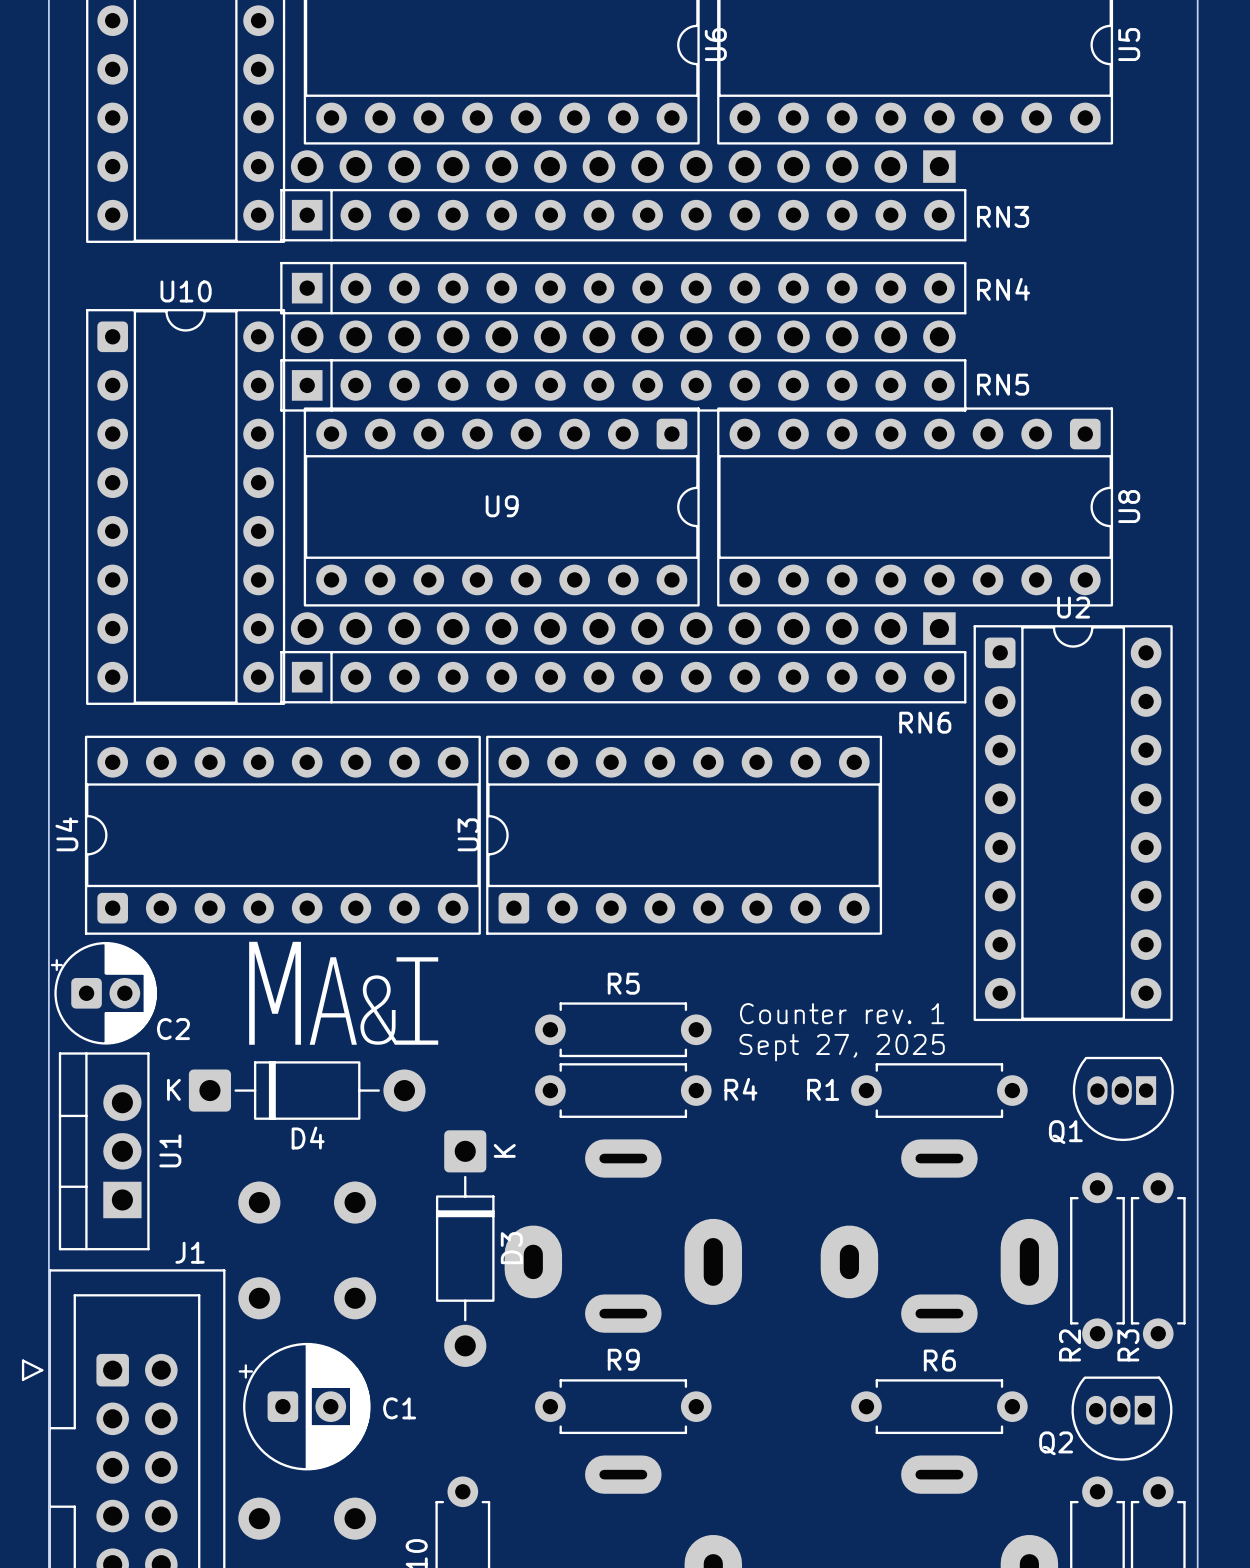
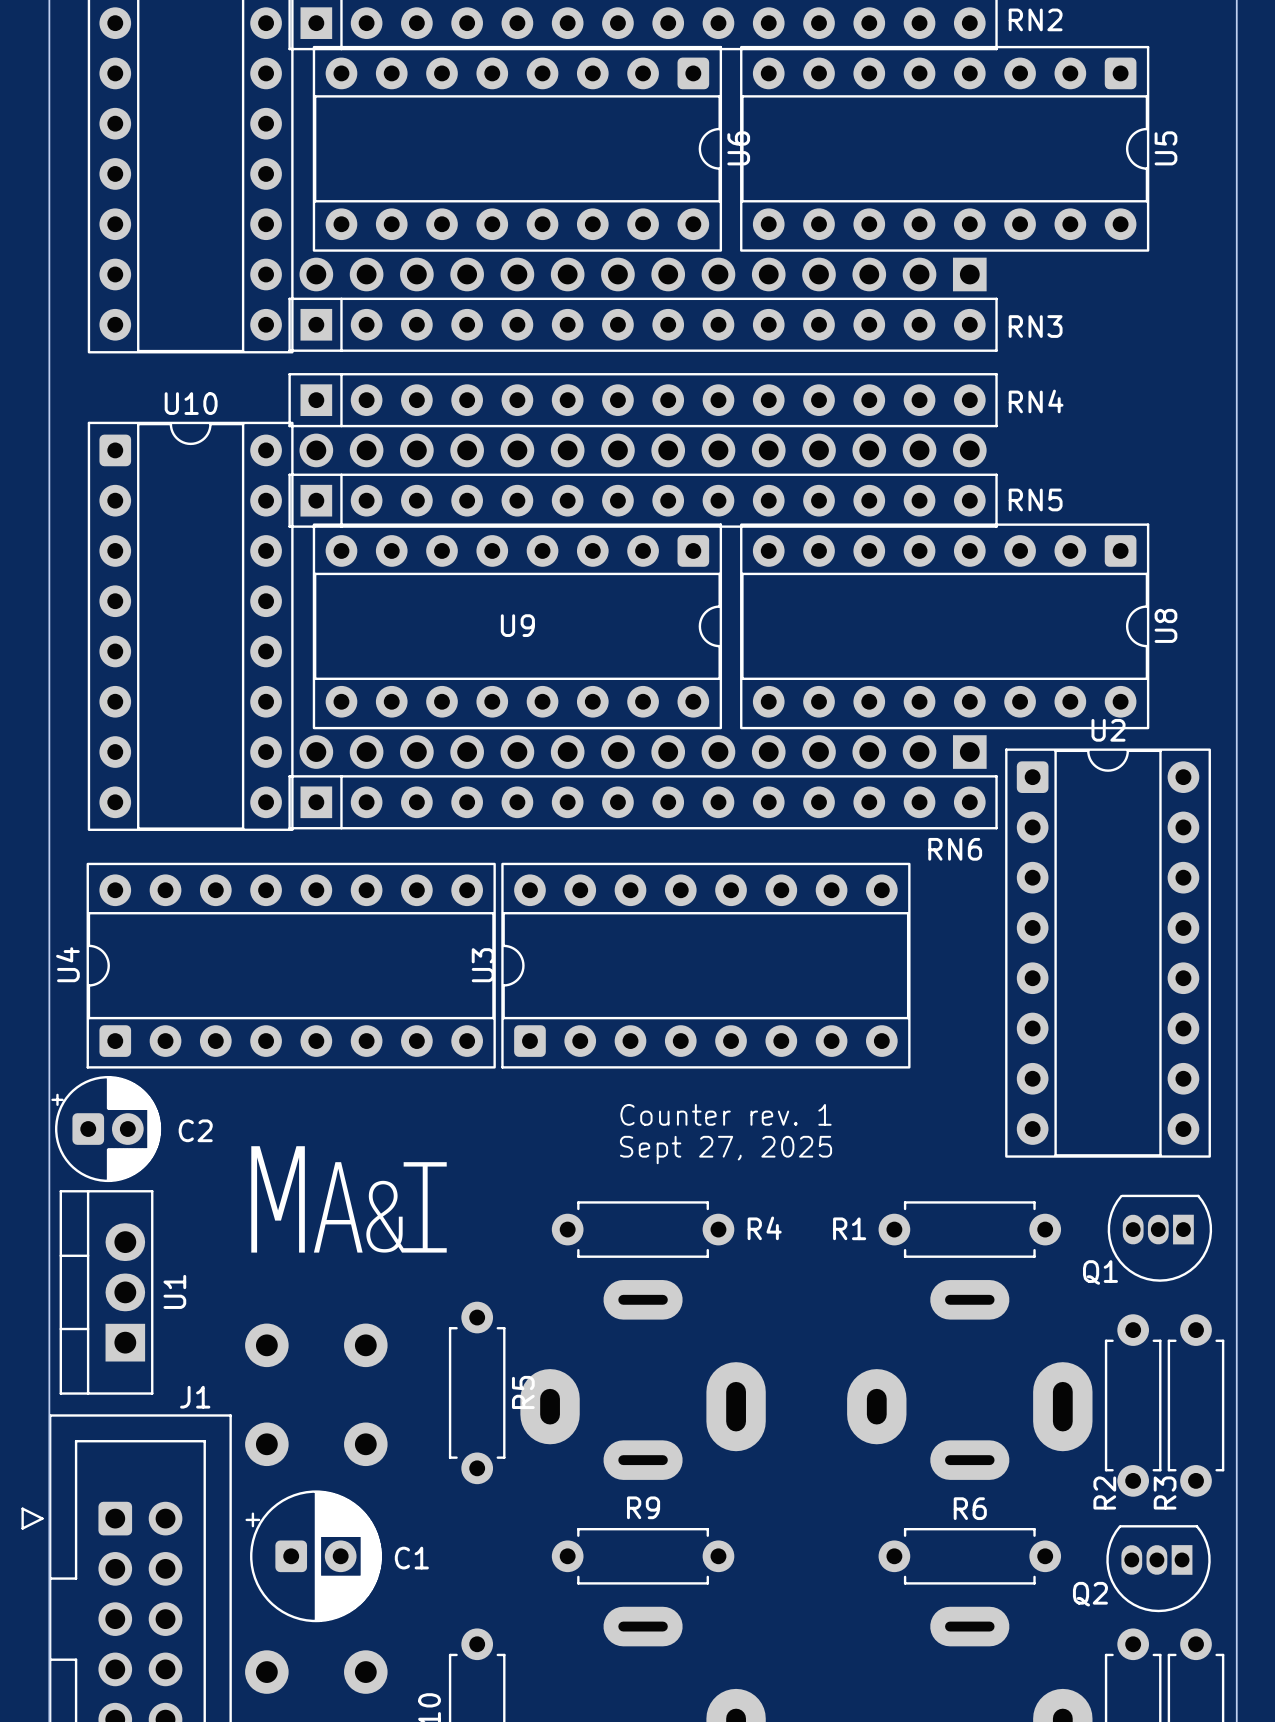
drawing position: (343, 993) -> (349, 1199)
text position: Counter rev. 1 (842, 1013) -> Counter rev. 1 (726, 1114)
C2 name position: C2 (173, 1029) -> C2 (195, 1130)
R5 rotation: 0° (623, 1029) -> 90° clockwise (477, 1392)
R5 position: (623, 1029) -> (477, 1392)
text position: Sept 27, 2025 (842, 1047) -> Sept 27, 2025 (726, 1150)
D4: (307, 1090) -> none
part: (465, 1248) -> none

